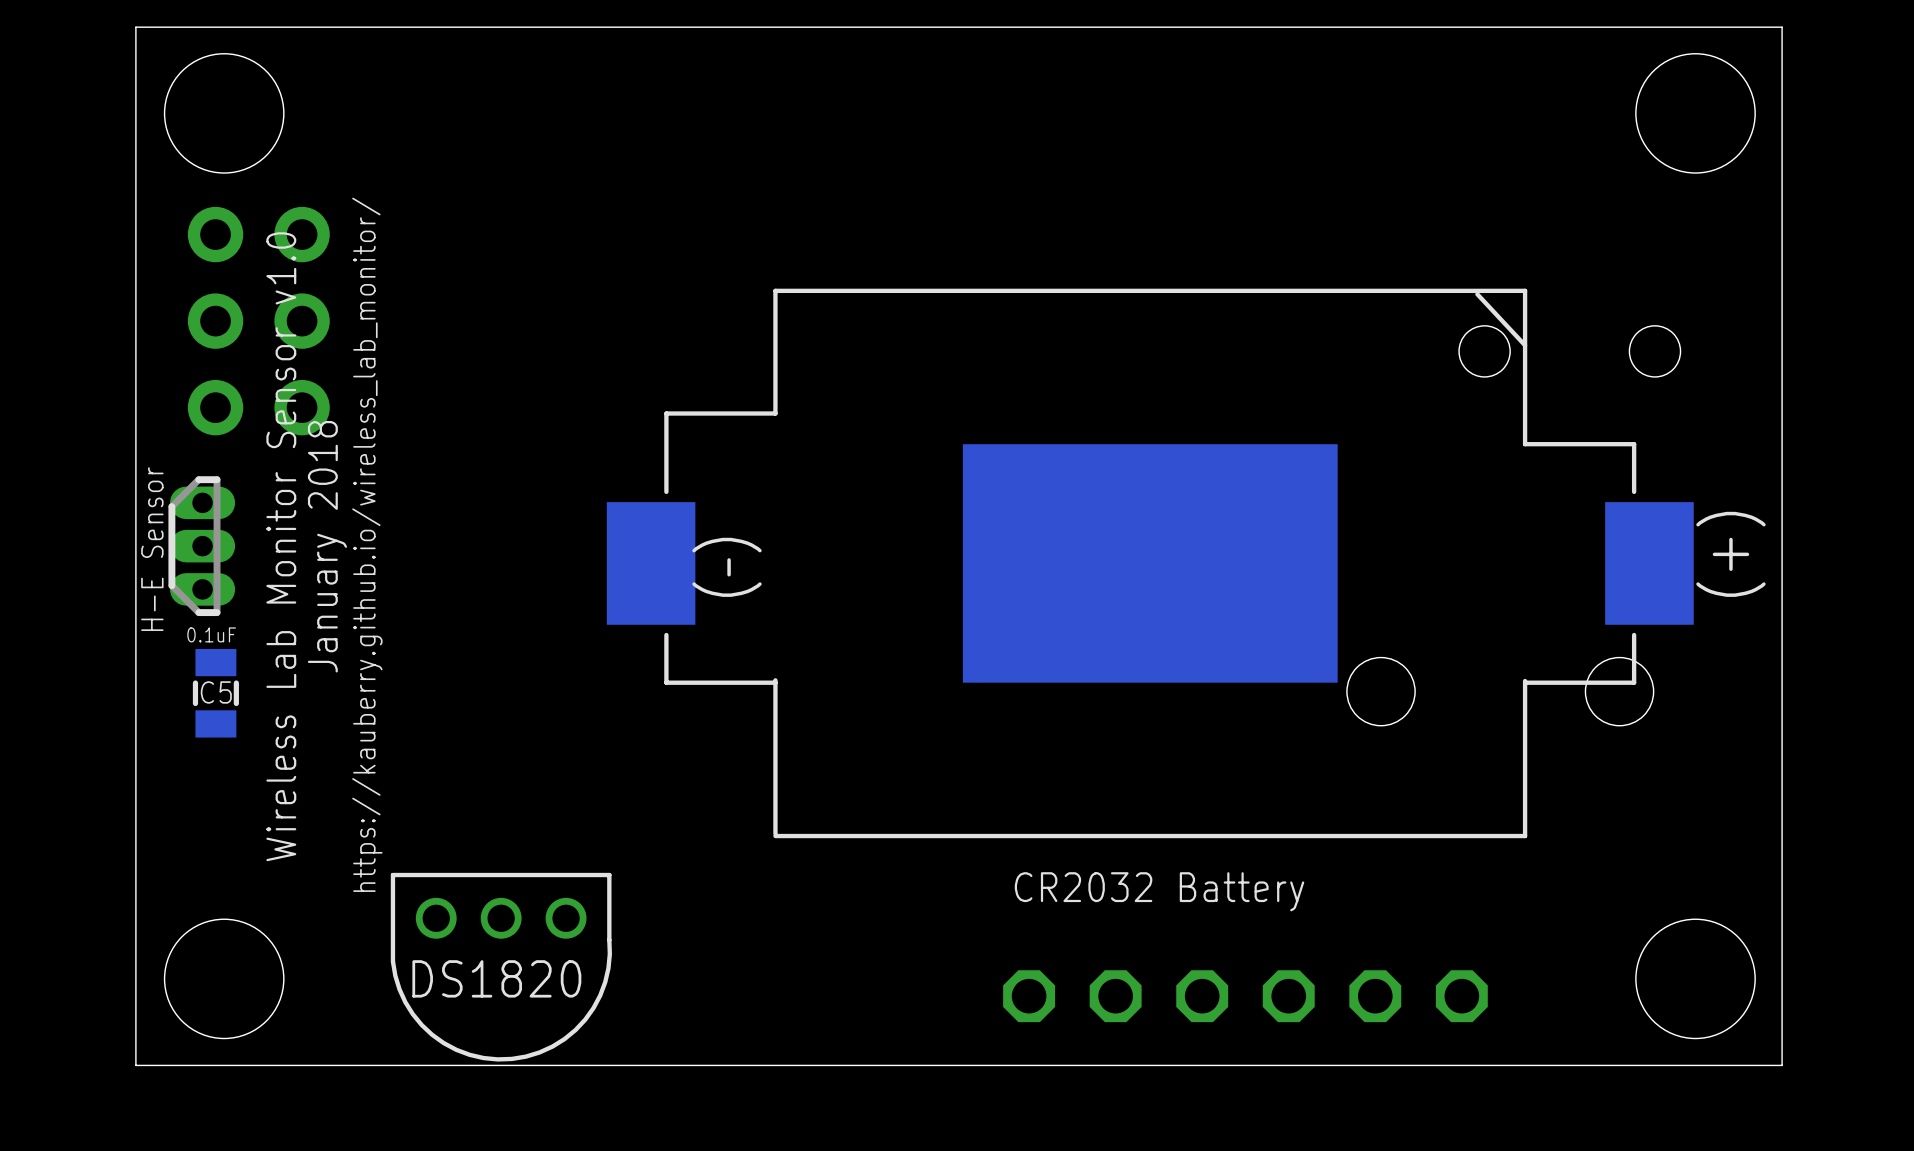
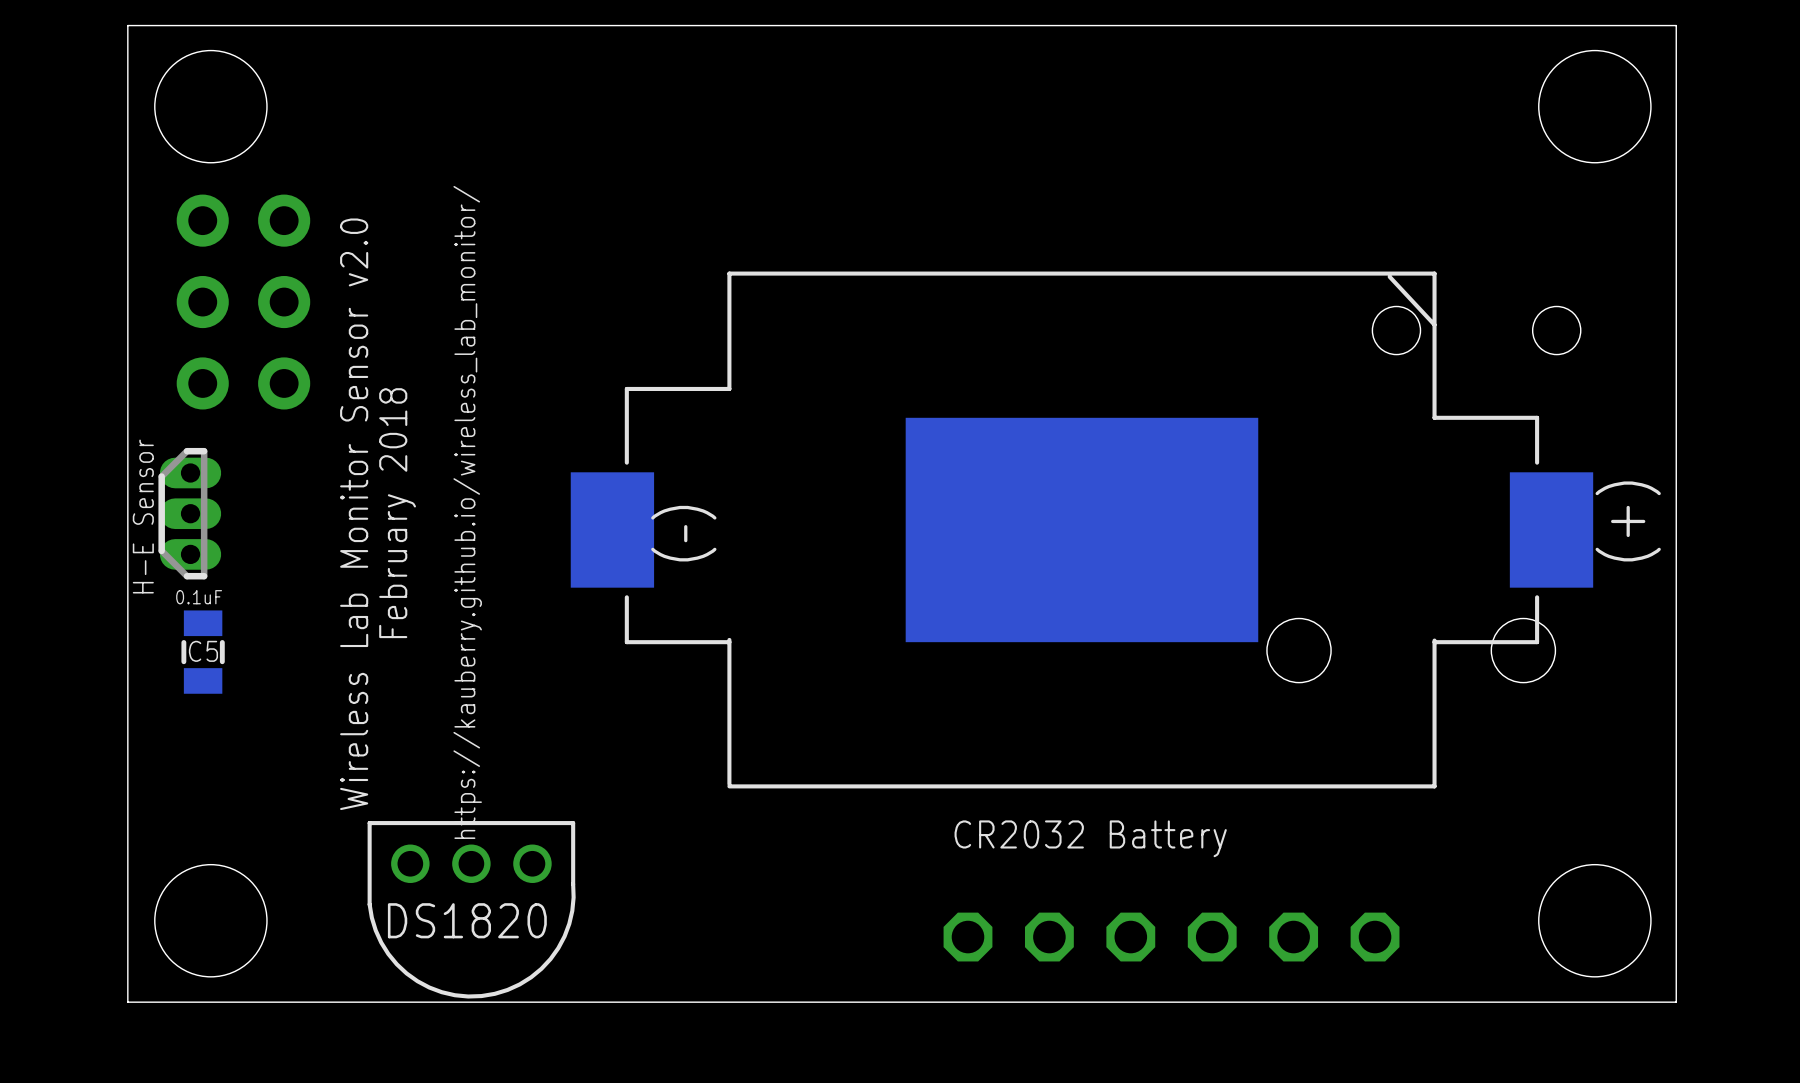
text: https://kauberry.github.io/wireless_lab_monitor/ (367, 544) -> Wireless Lab Monitor Sensor v2.0 (354, 514)
text: none -> https://kauberry.github.io/wireless_lab_monitor/ (467, 512)
text: none -> February 2018 (397, 513)
text: Wireless Lab Monitor Sensor v1.0 (281, 546) -> none
text: January 2018 (327, 546) -> none

